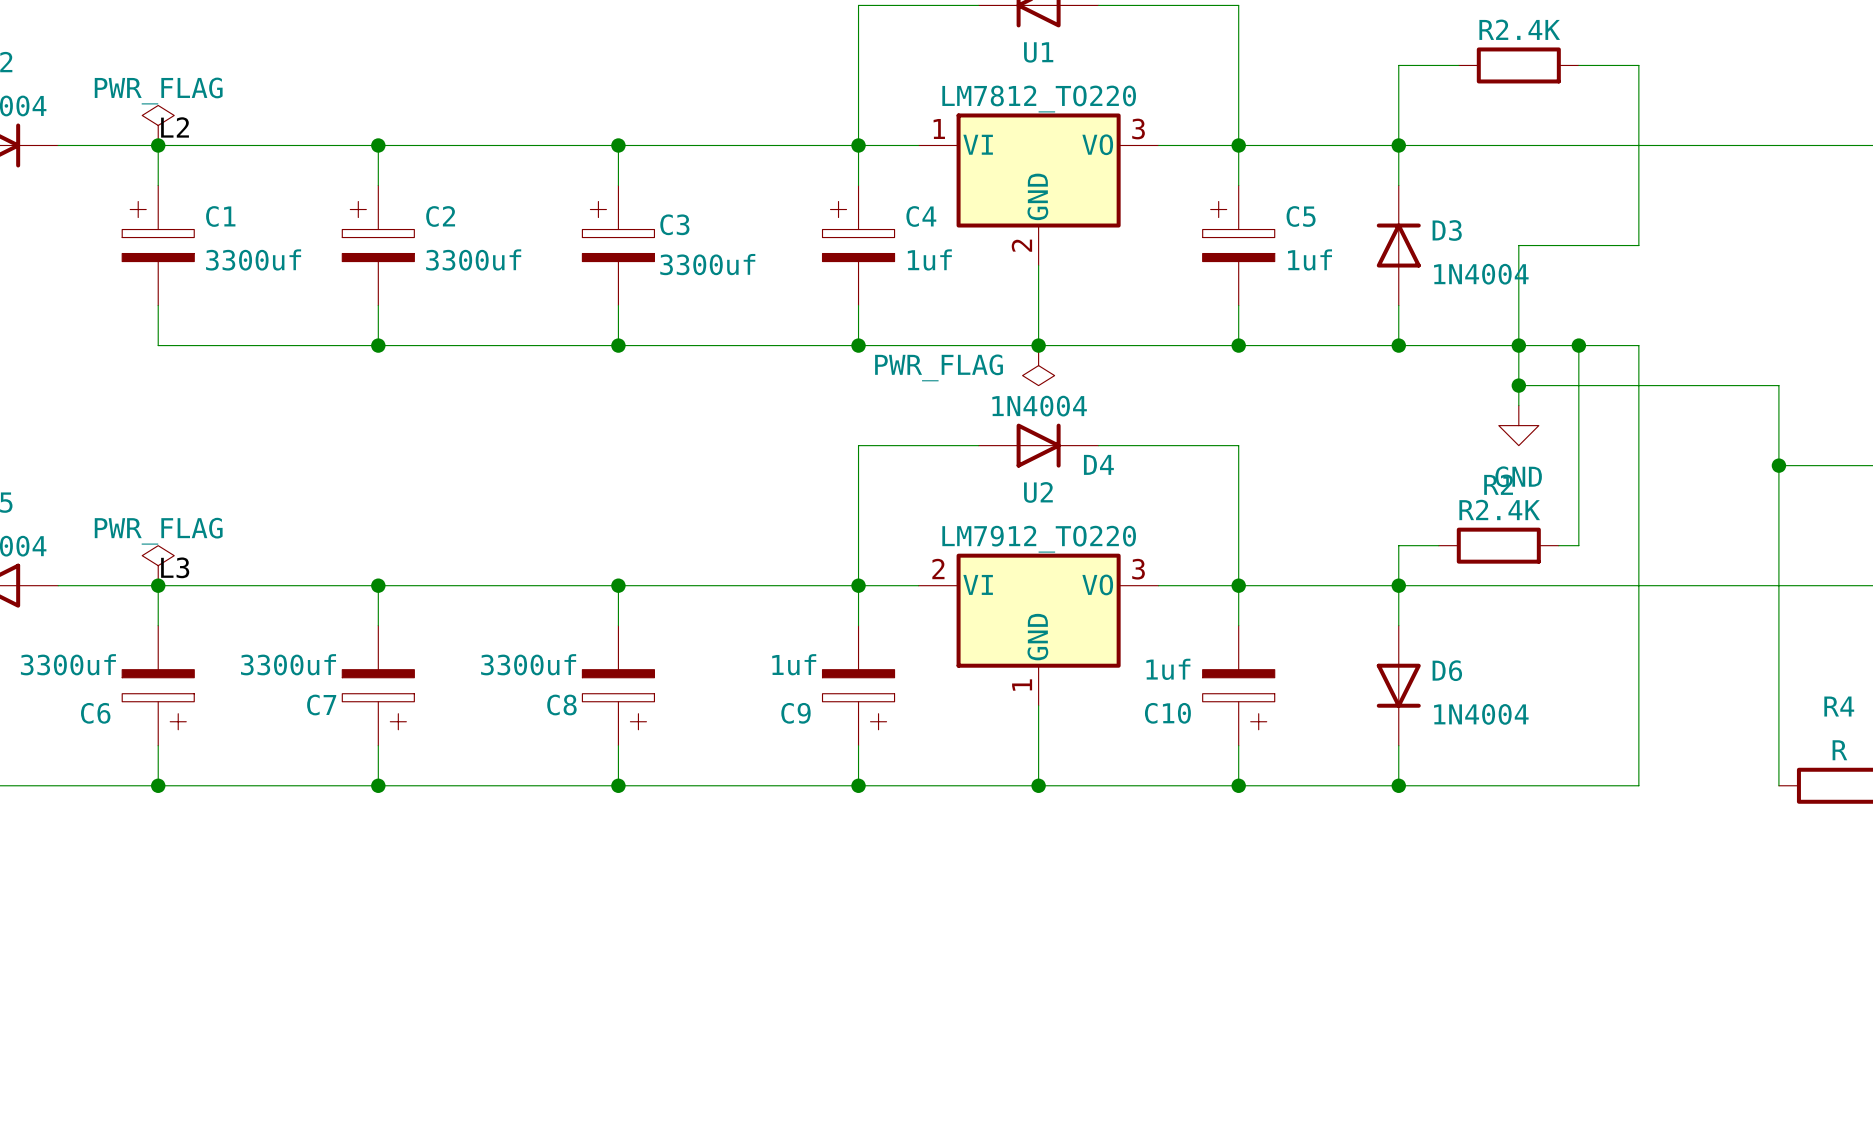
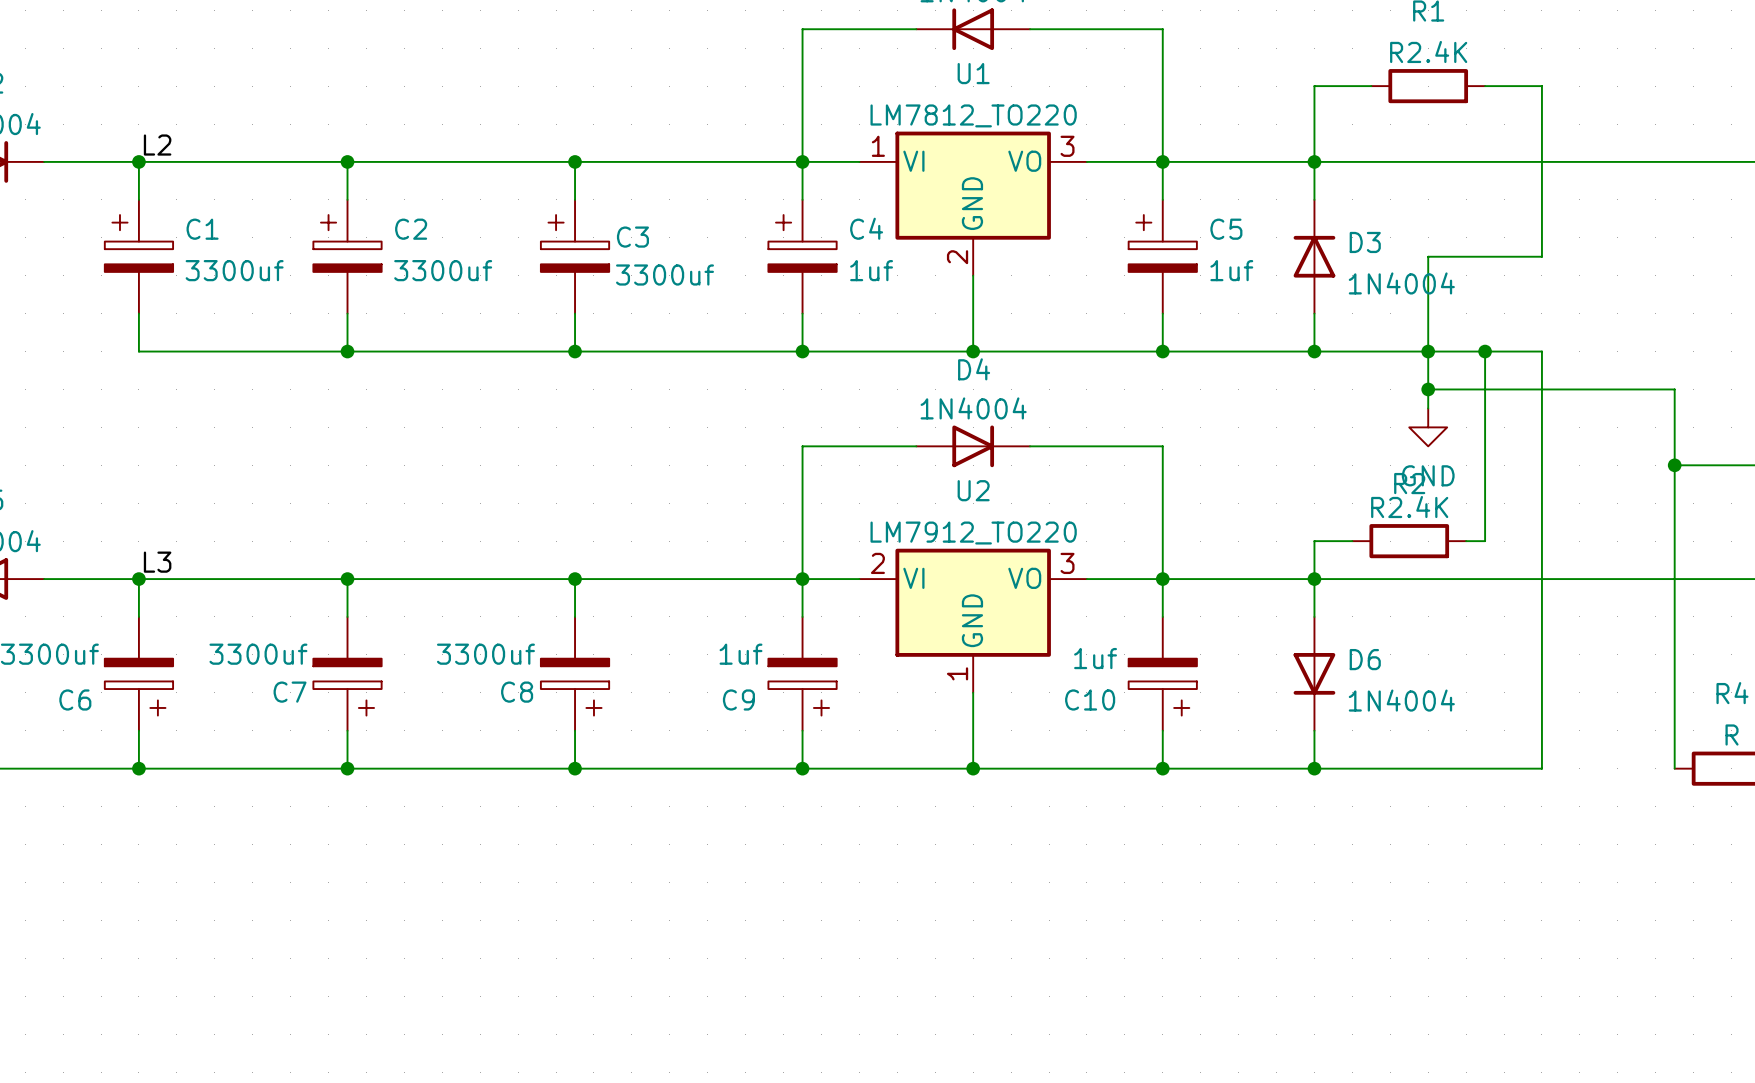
power symbol: PWR_FLAG (158, 125) -> none
power symbol: PWR_FLAG (1038, 365) -> none
D4 name position: D4 (1098, 464) -> D4 (974, 369)
power symbol: PWR_FLAG (158, 565) -> none

